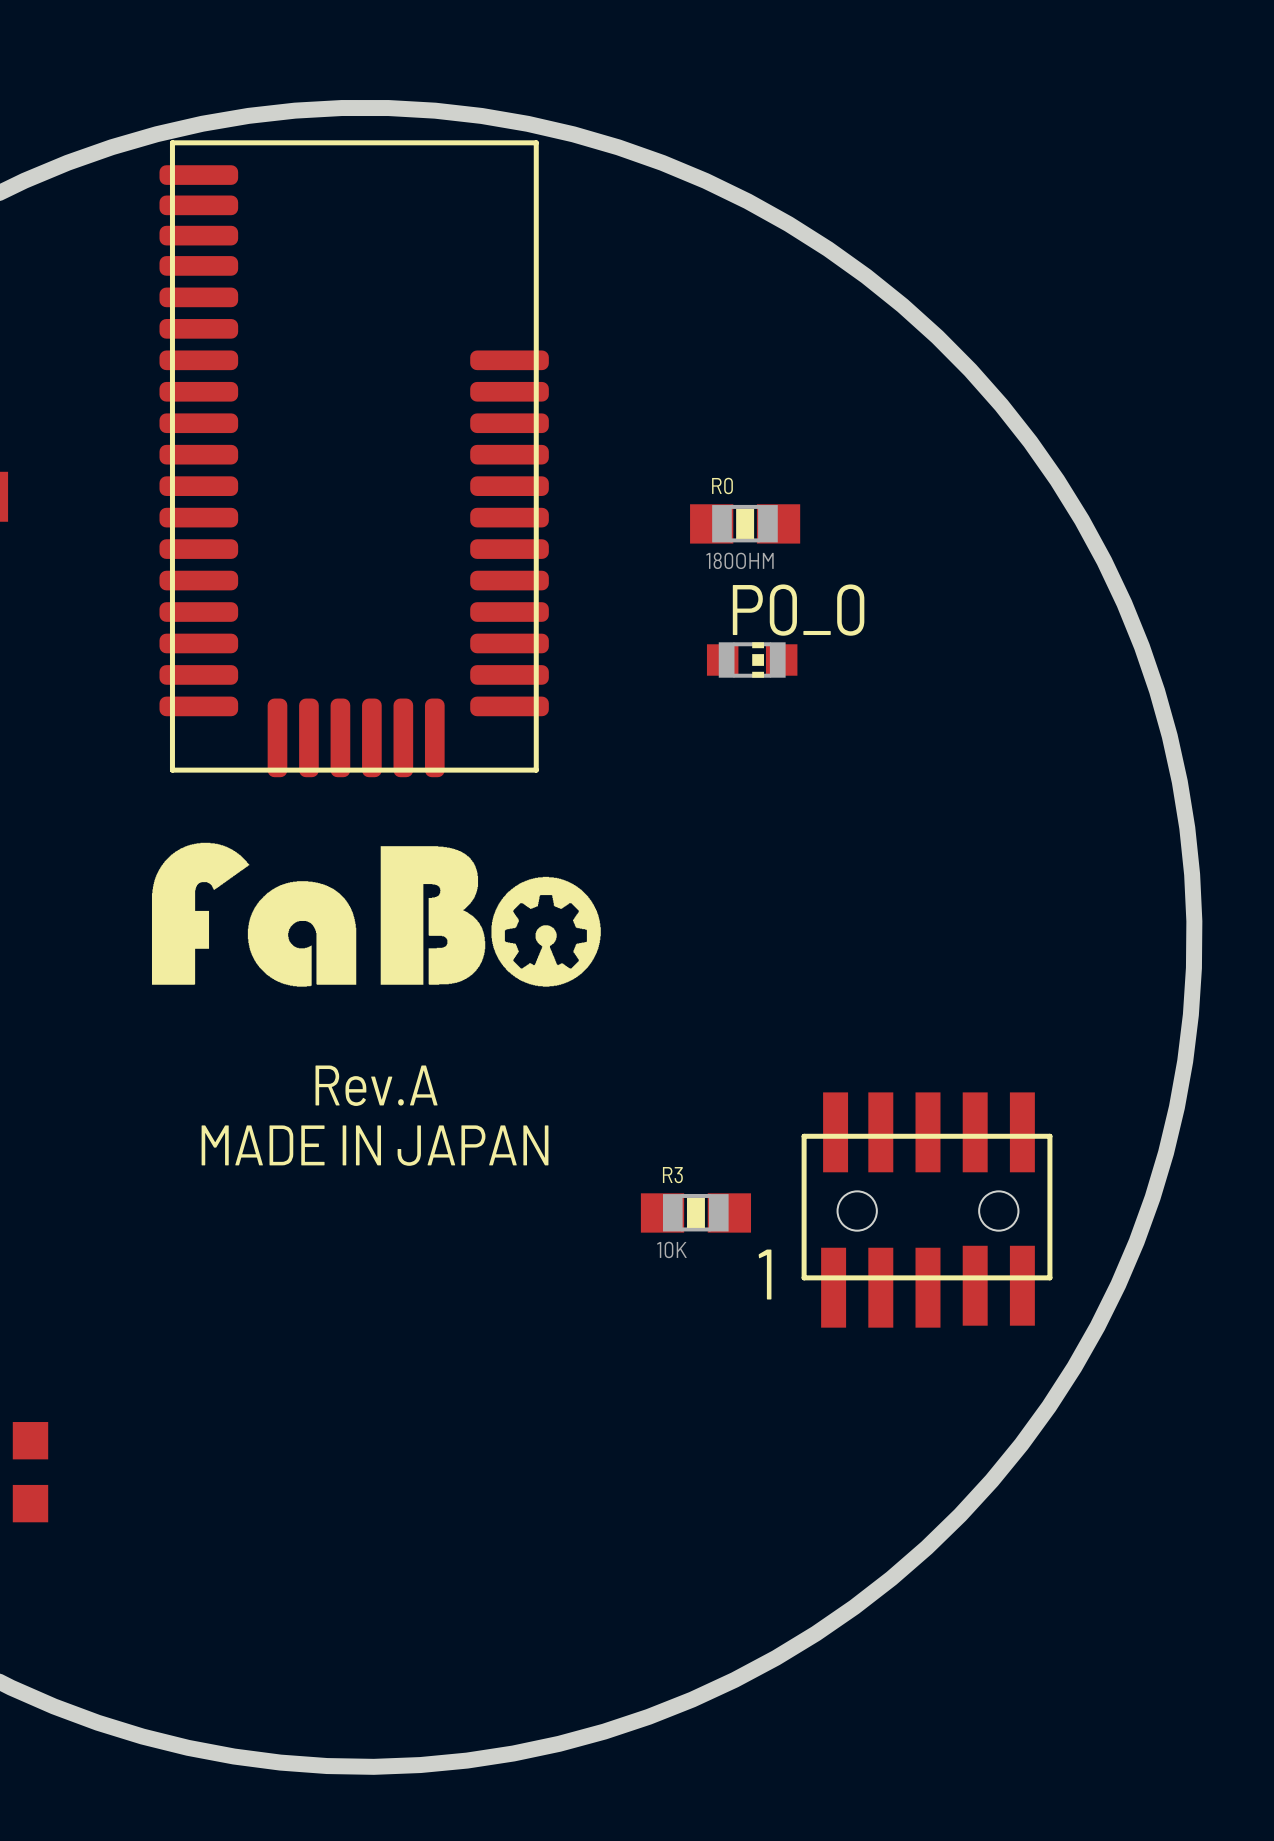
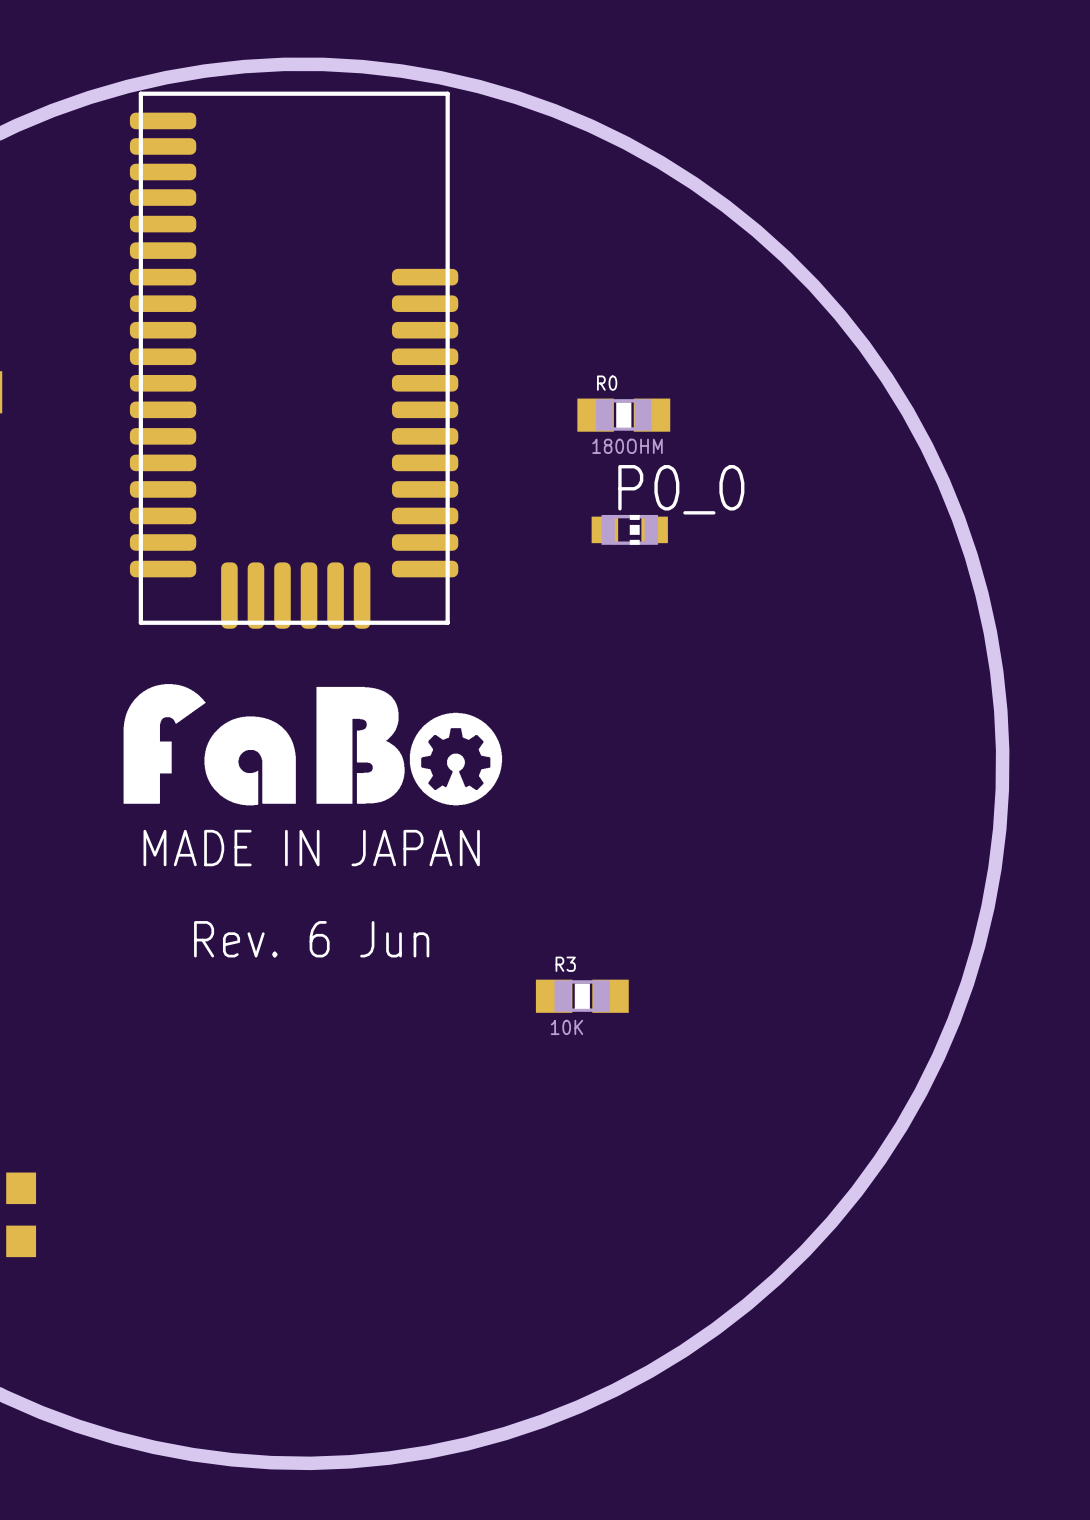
text: none -> MADE IN JAPAN (311, 848)
text: Rev.A (376, 1085) -> none
text: MADE IN JAPAN (375, 1145) -> Rev. 6 Jun (311, 939)
part: (927, 1210) -> none

